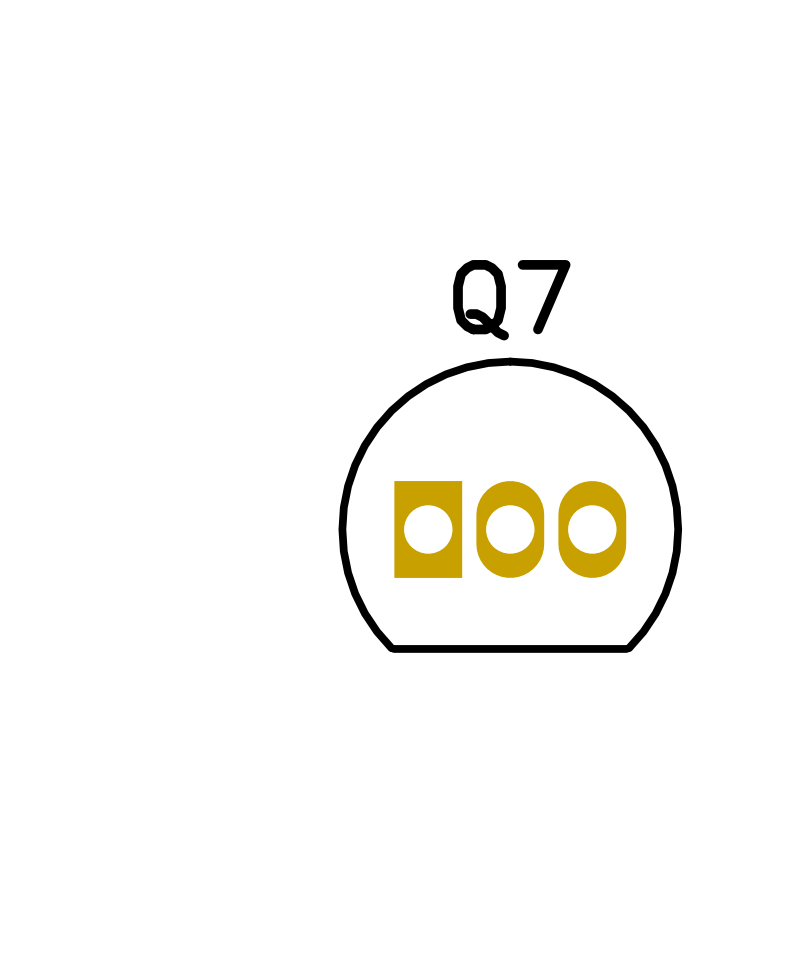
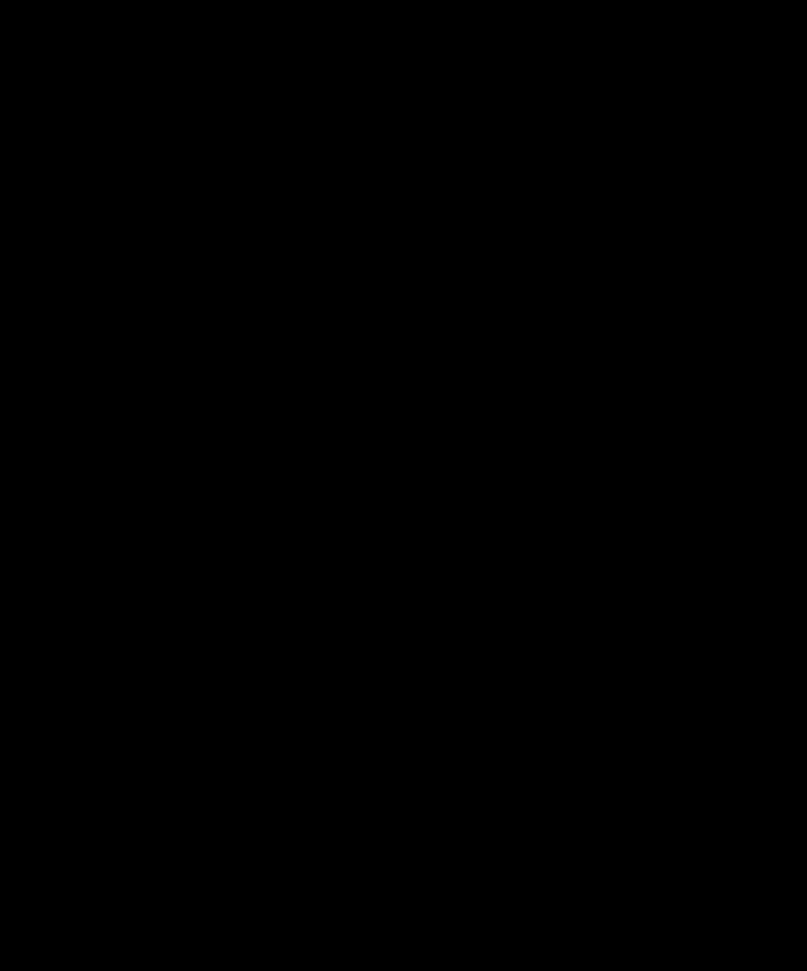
Q7: (510, 505) -> none

